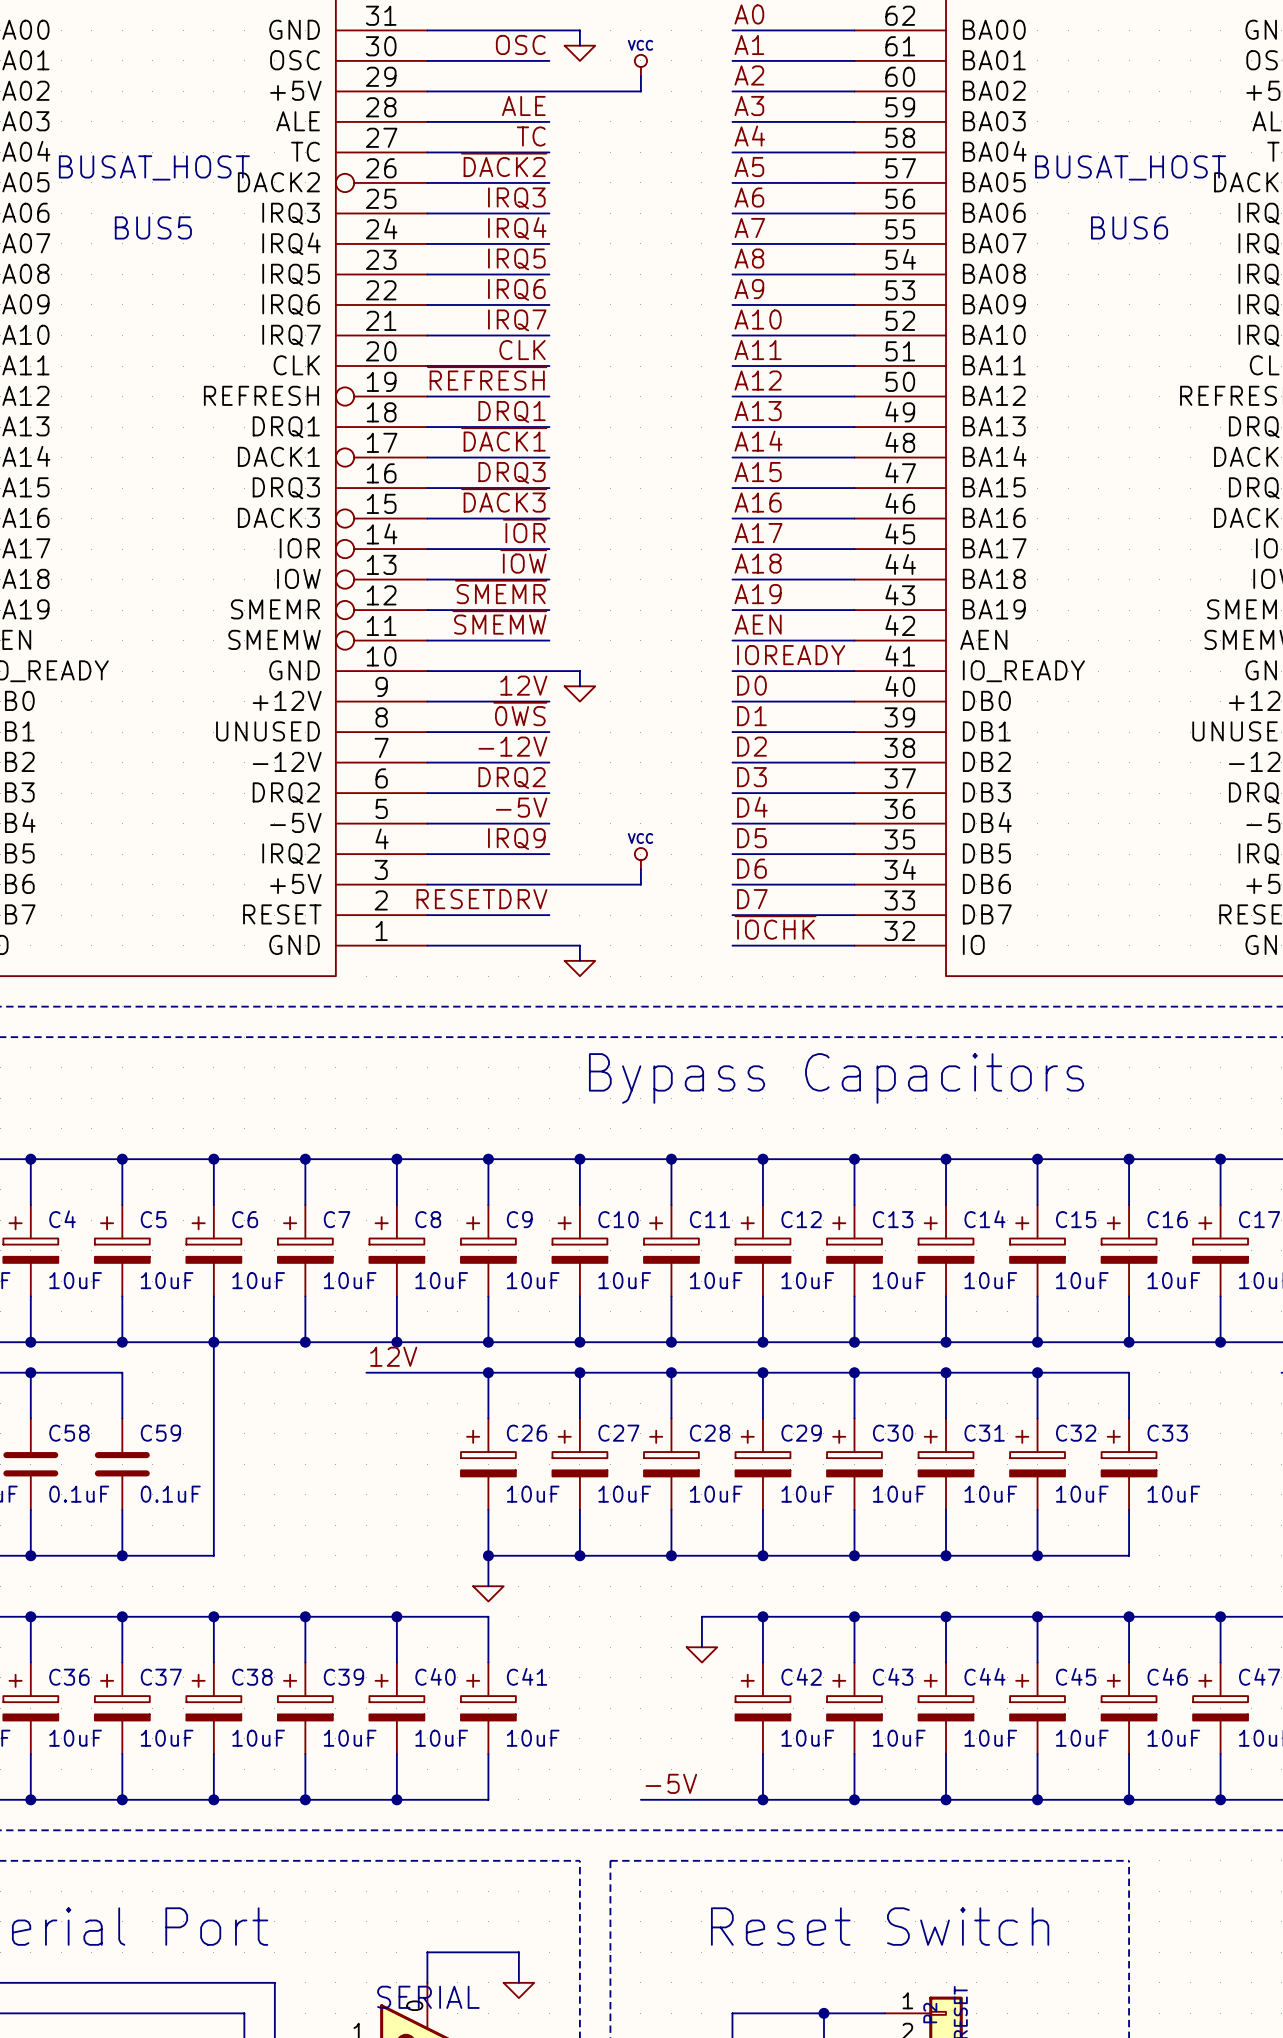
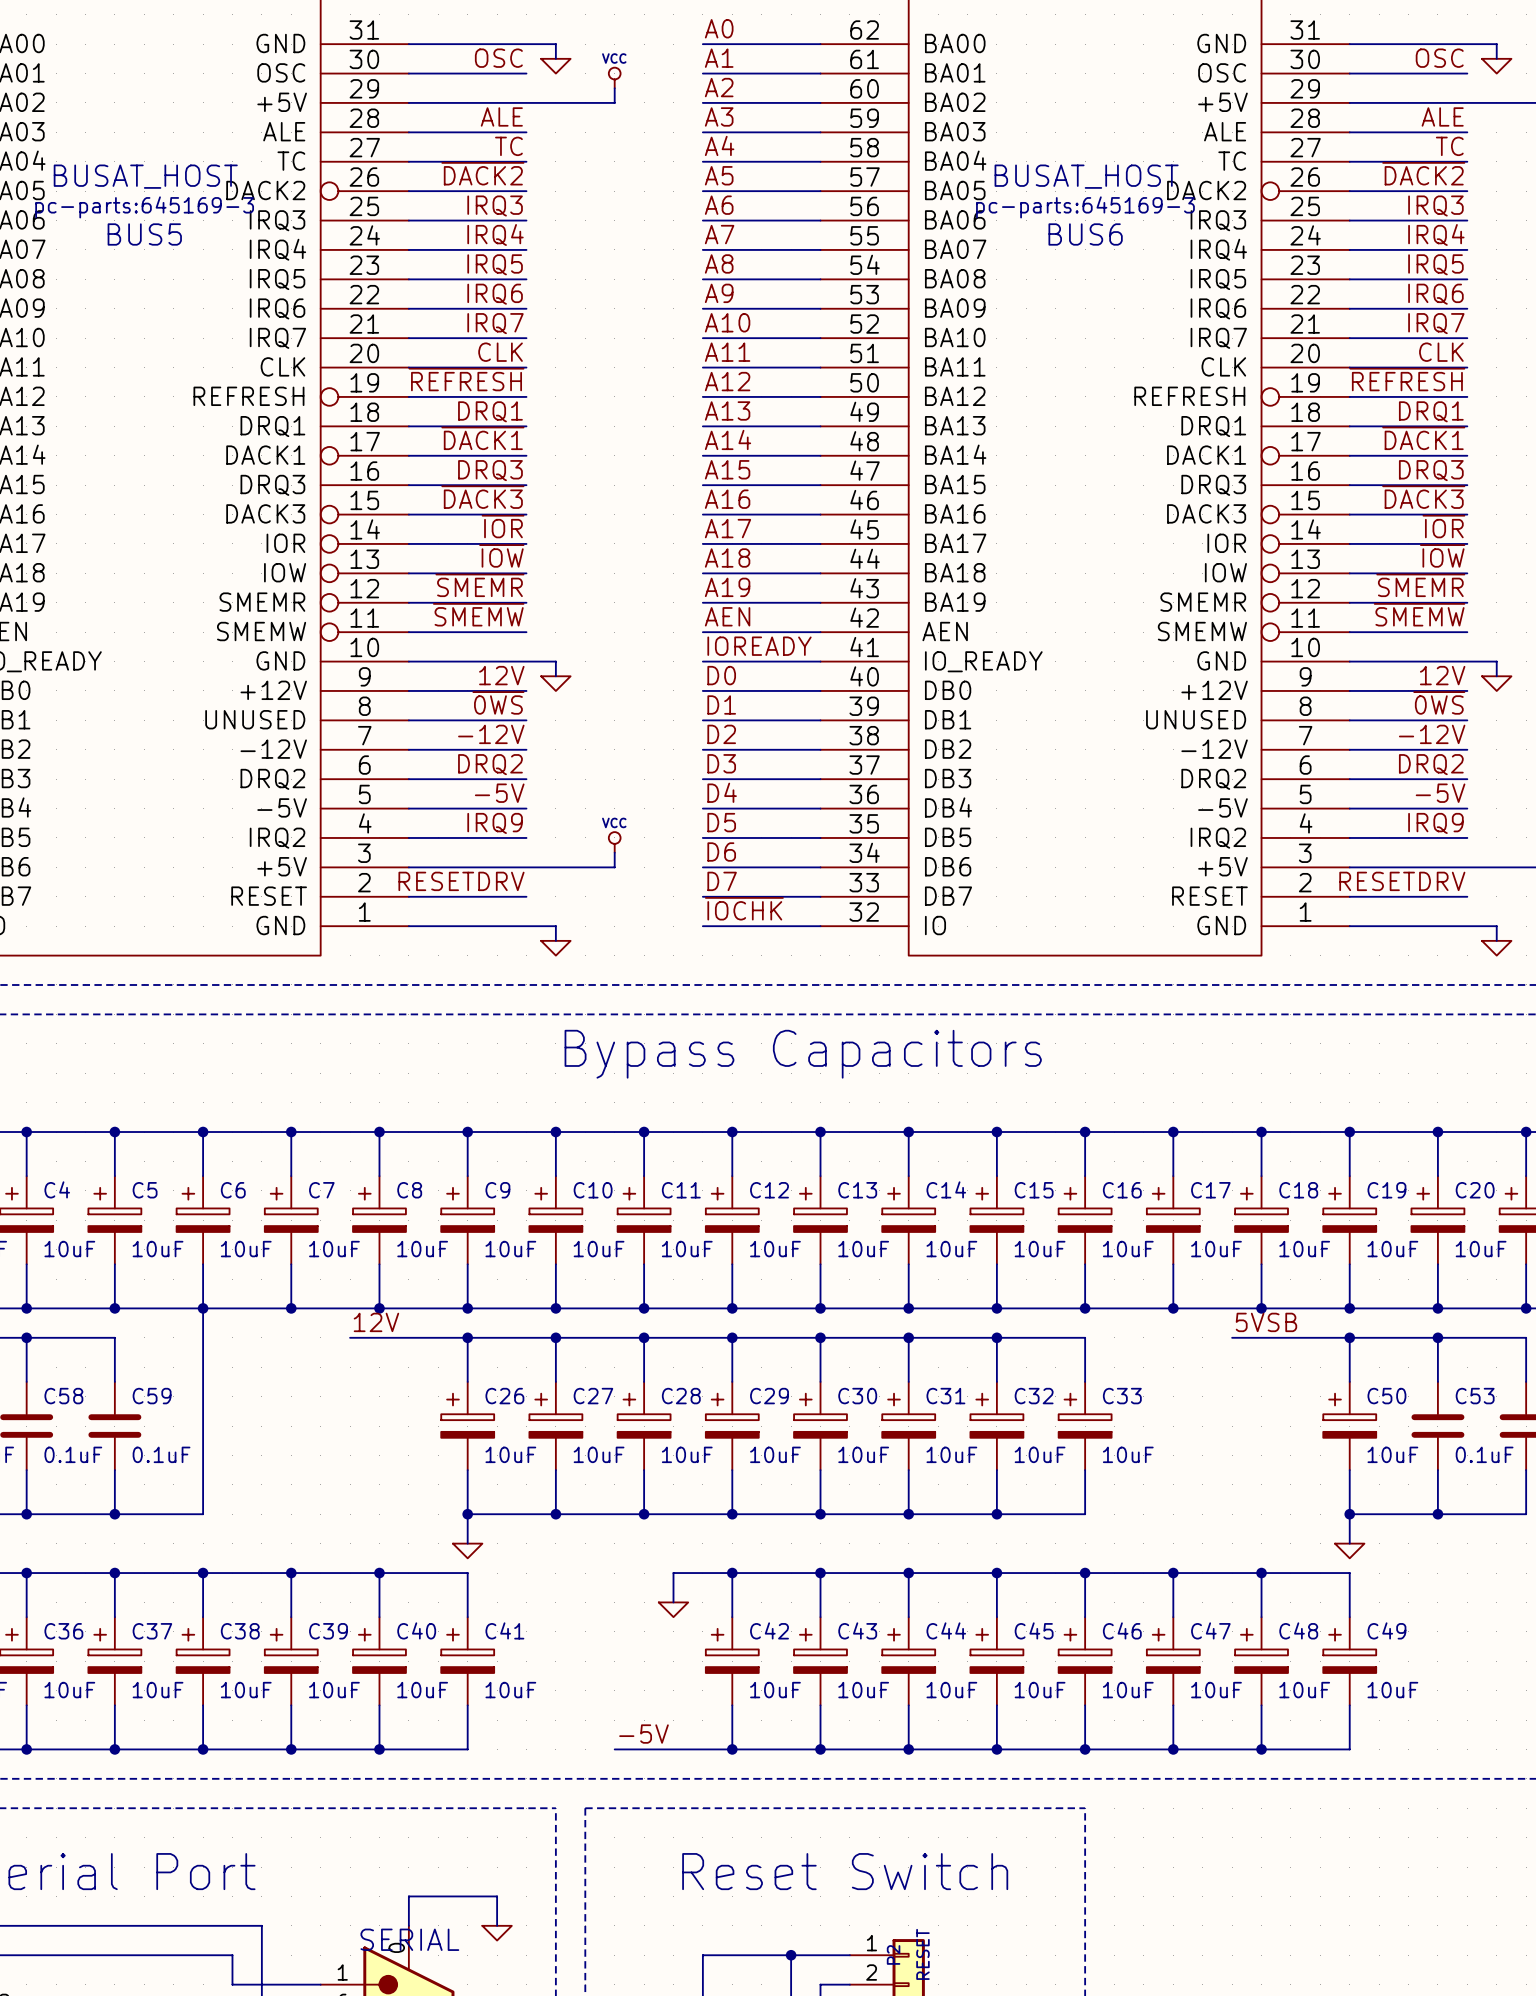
BUS5 text: none -> pc-parts:645169-3 (144, 207)
BUS6 text: none -> pc-parts:645169-3 (1085, 207)

